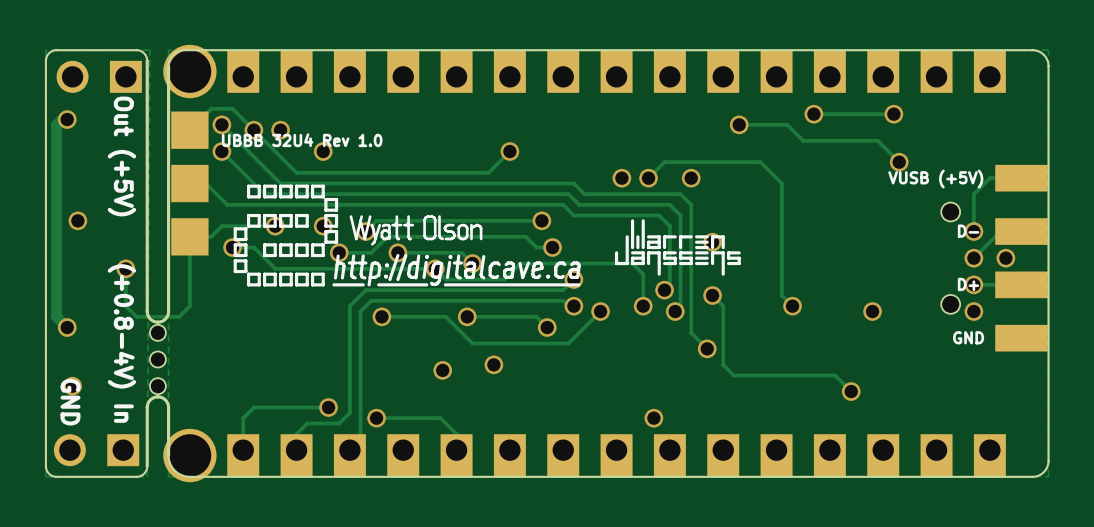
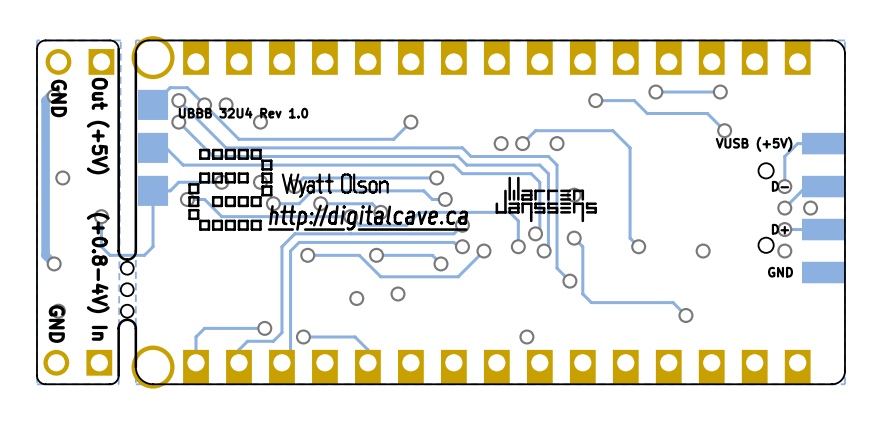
text: none -> GND (58, 98)

